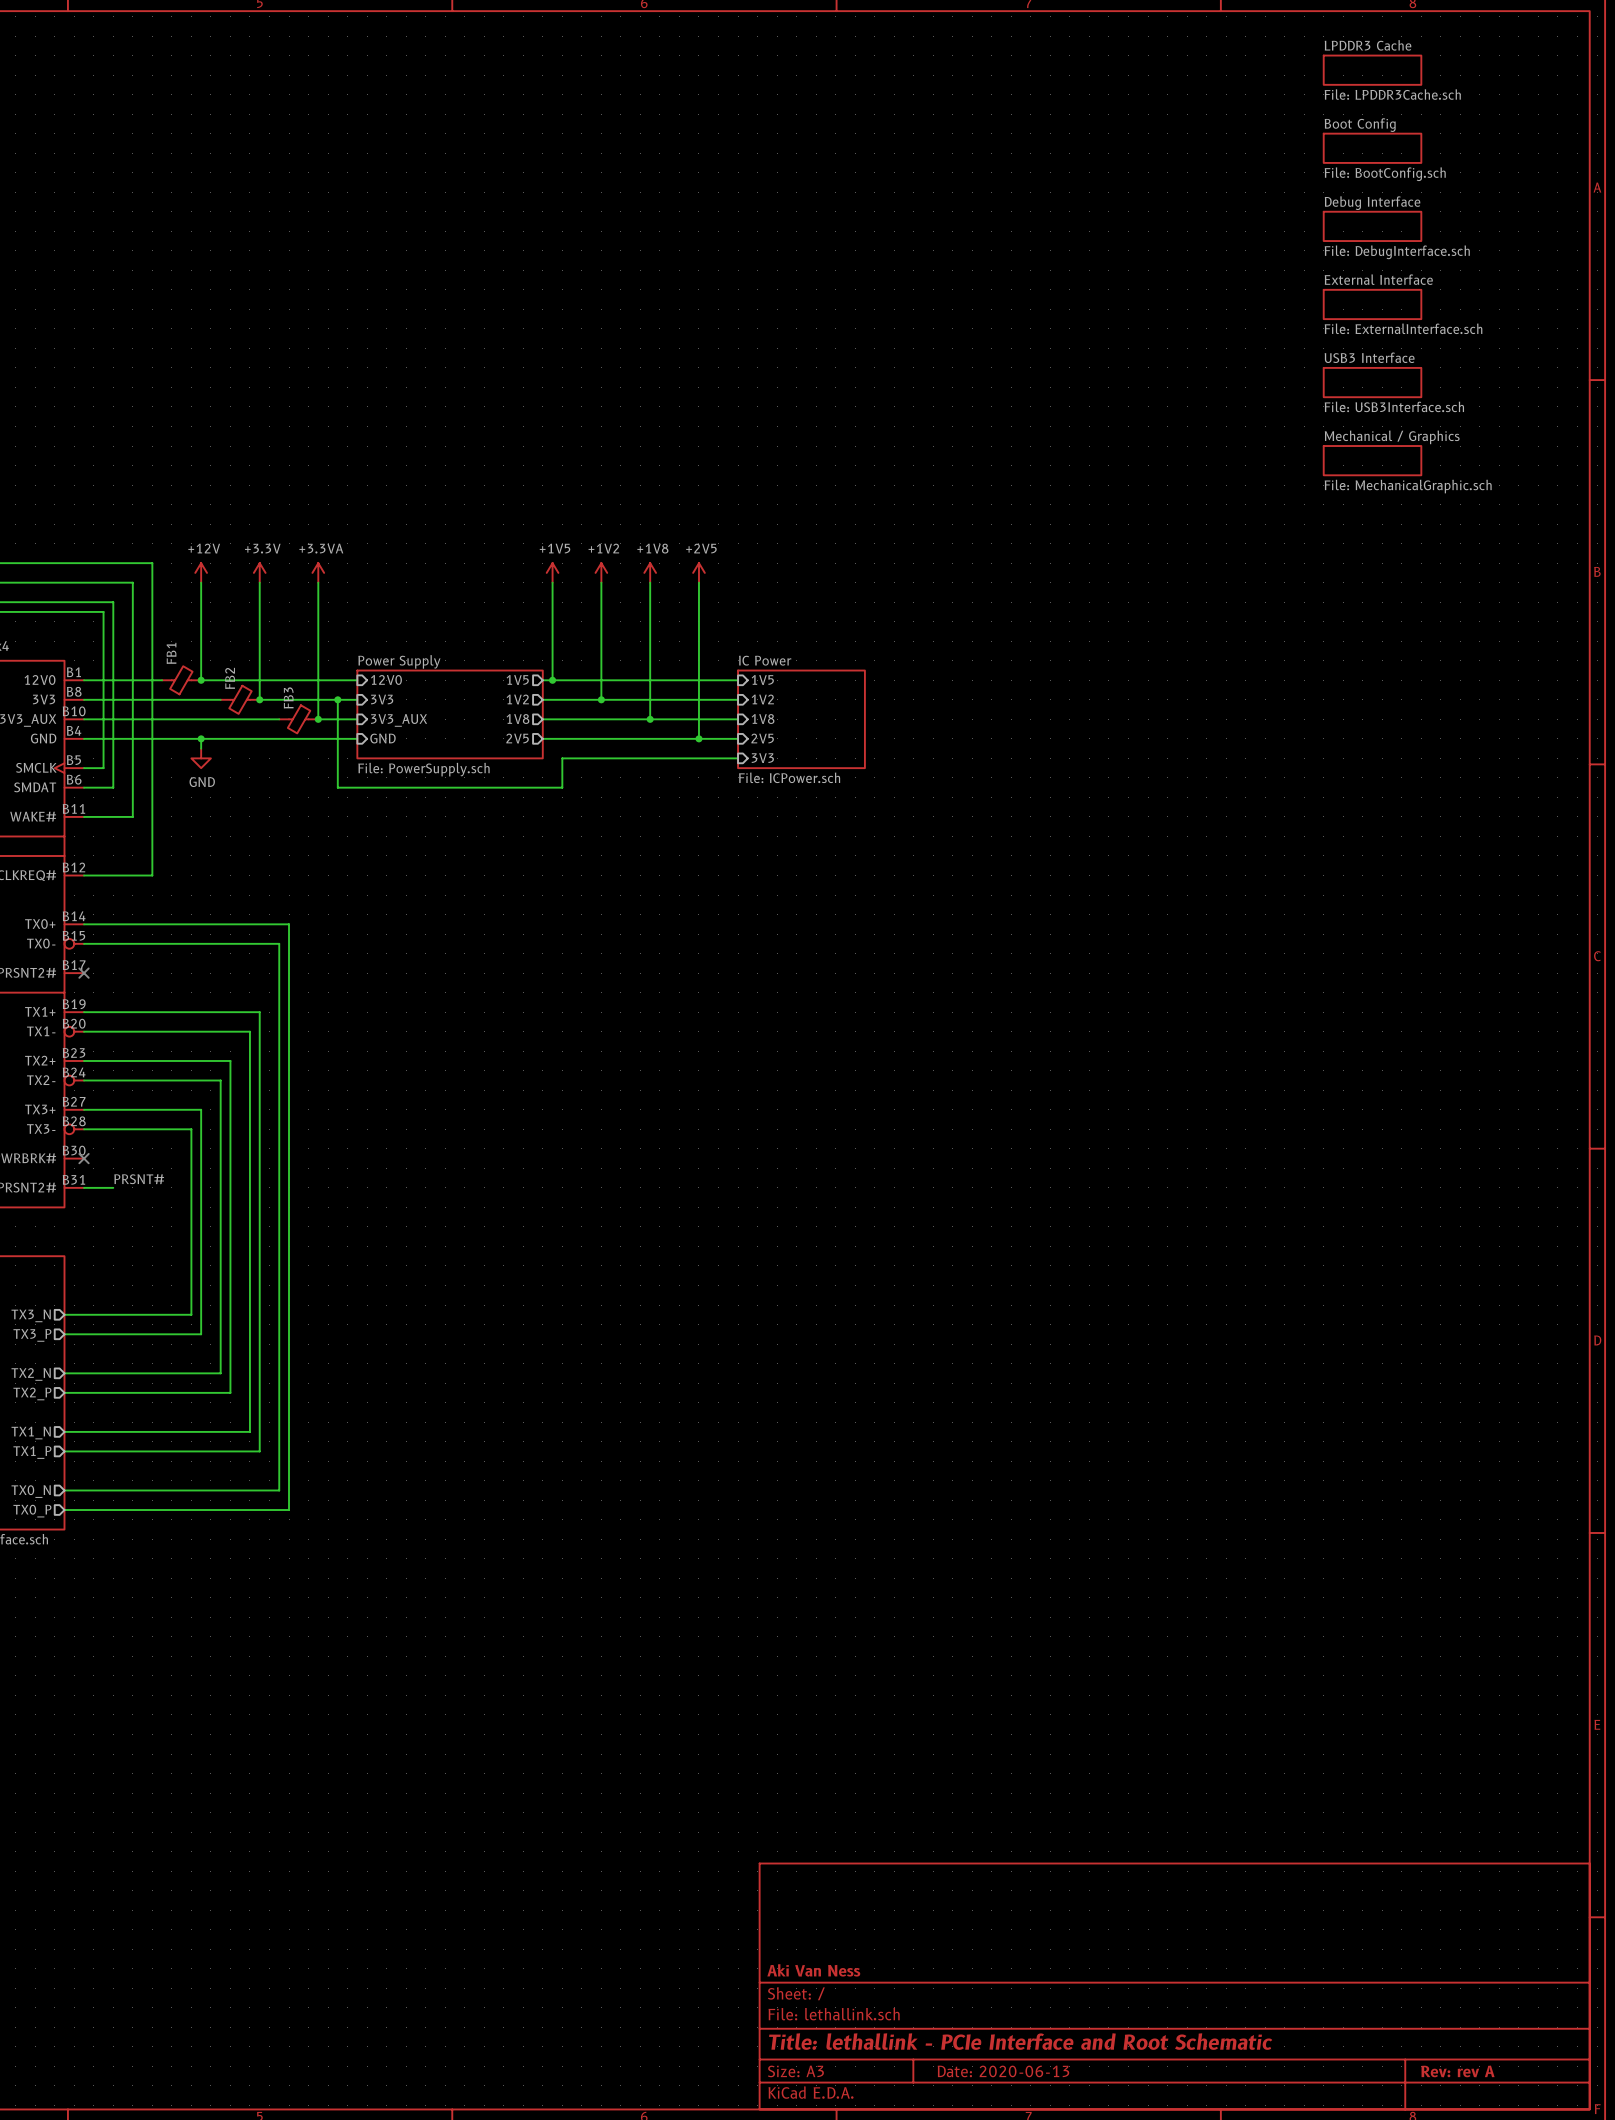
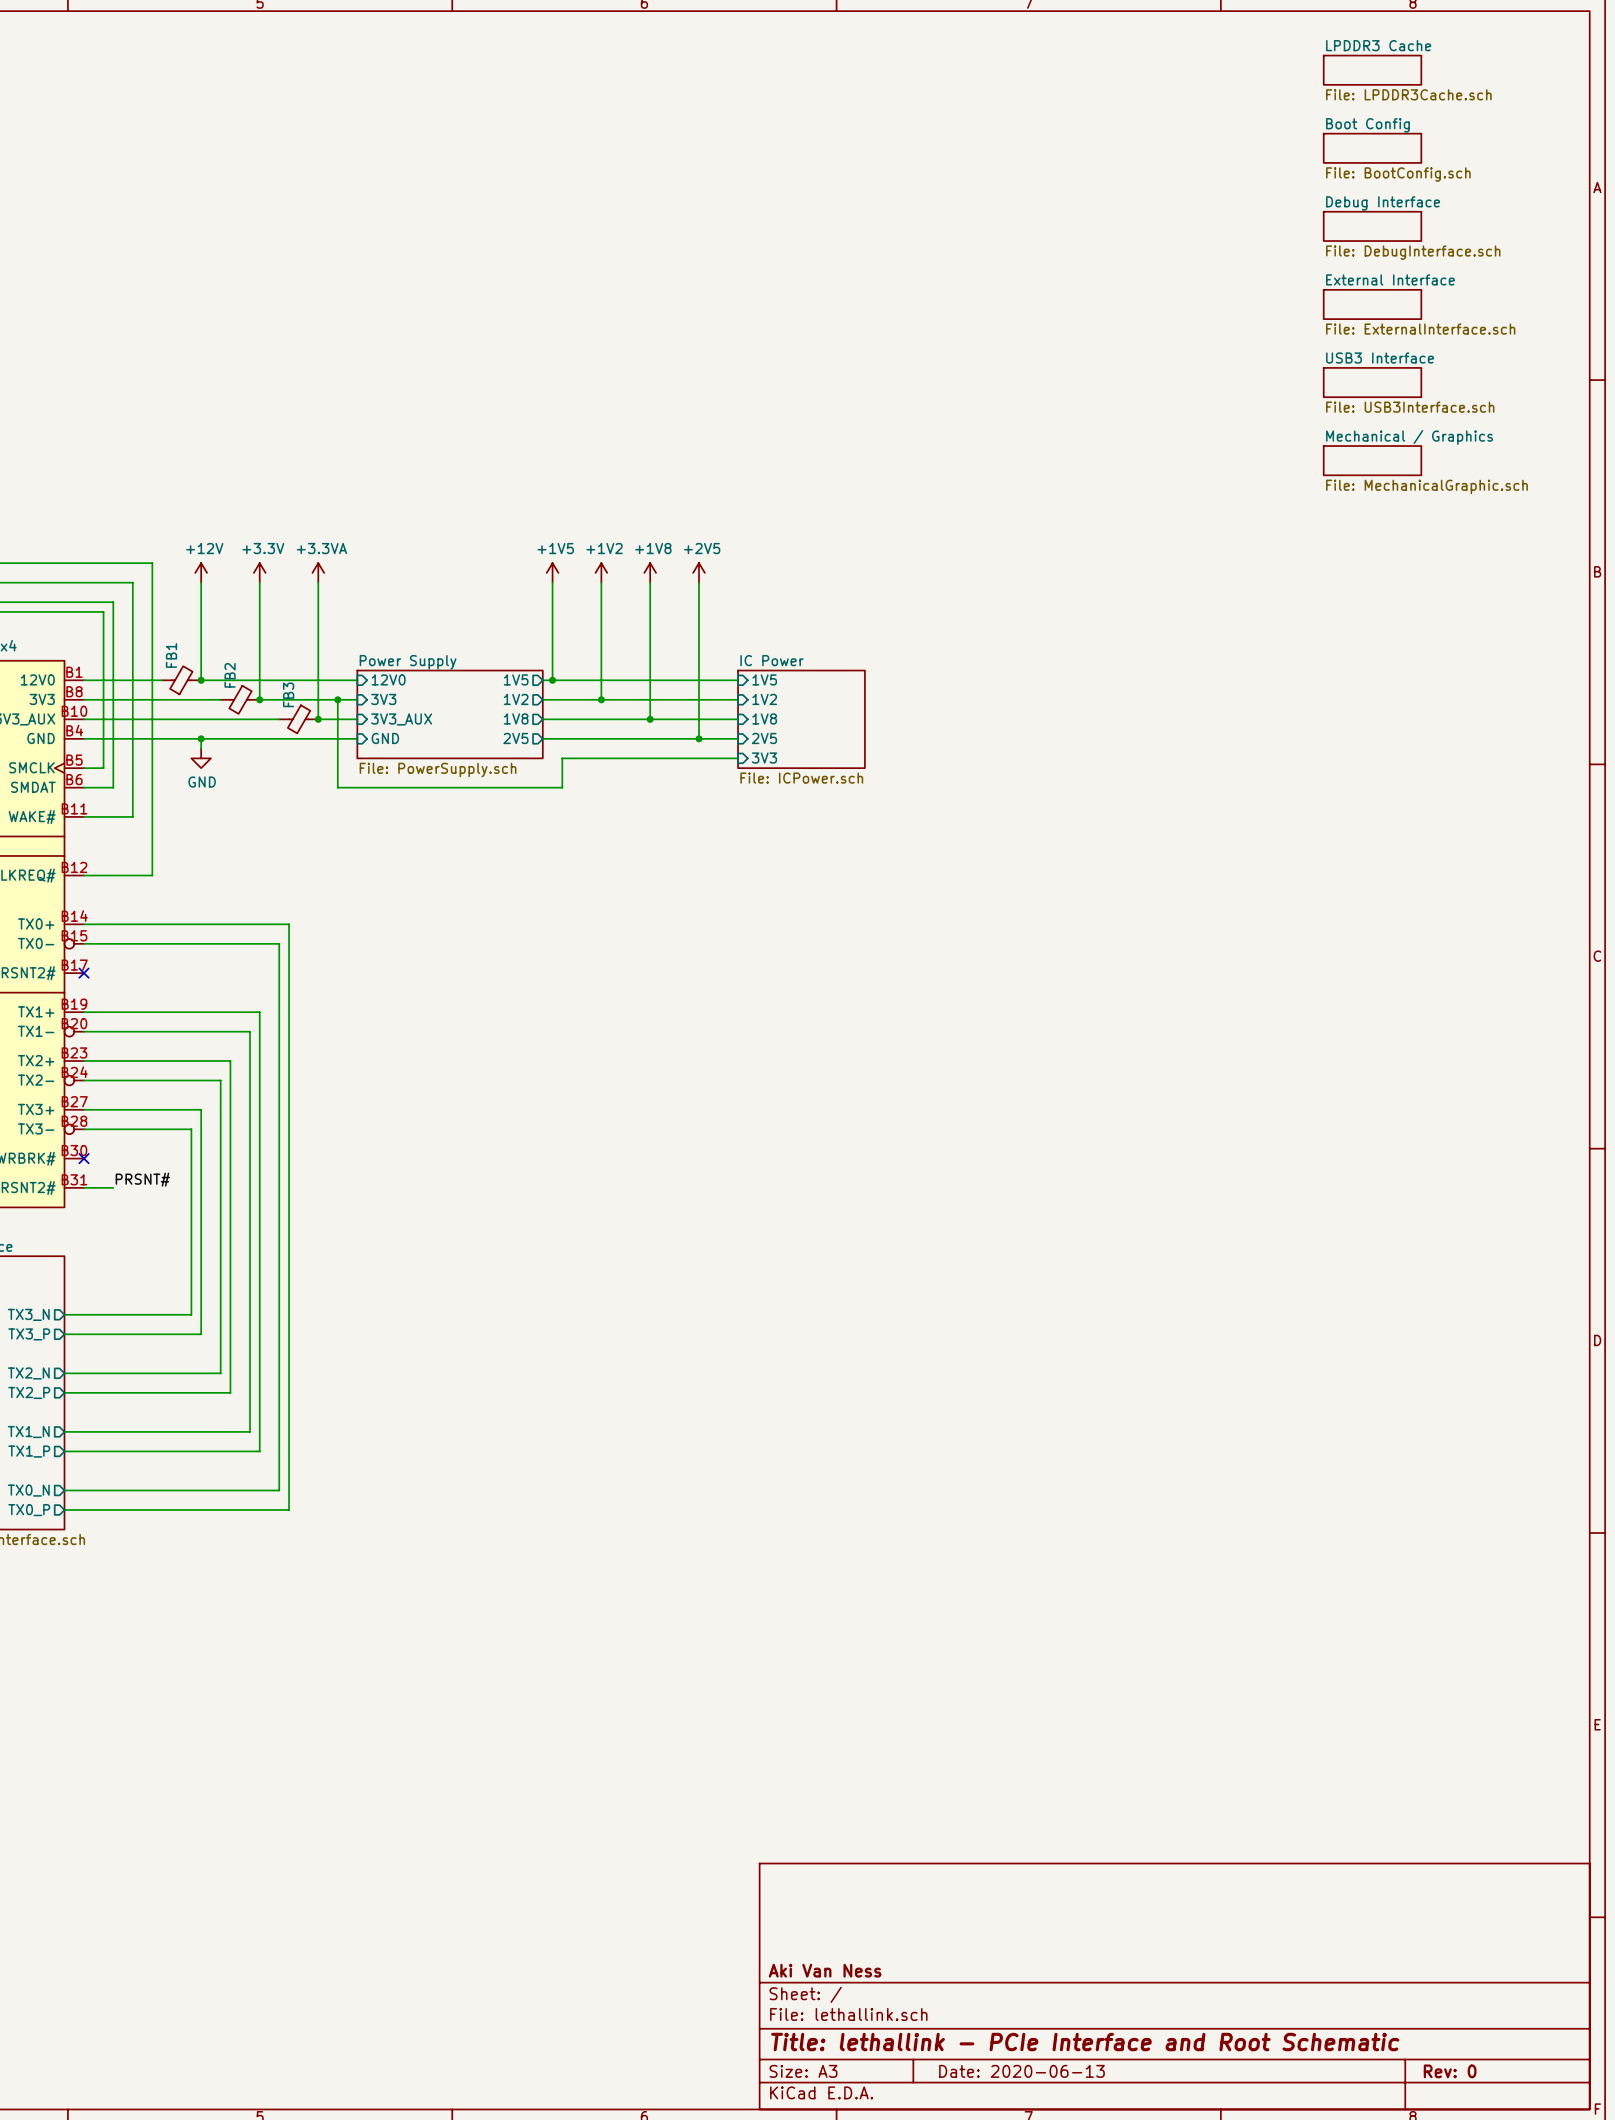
title block: Rev: rev A (1457, 2071) -> Rev: 0 (1450, 2071)

